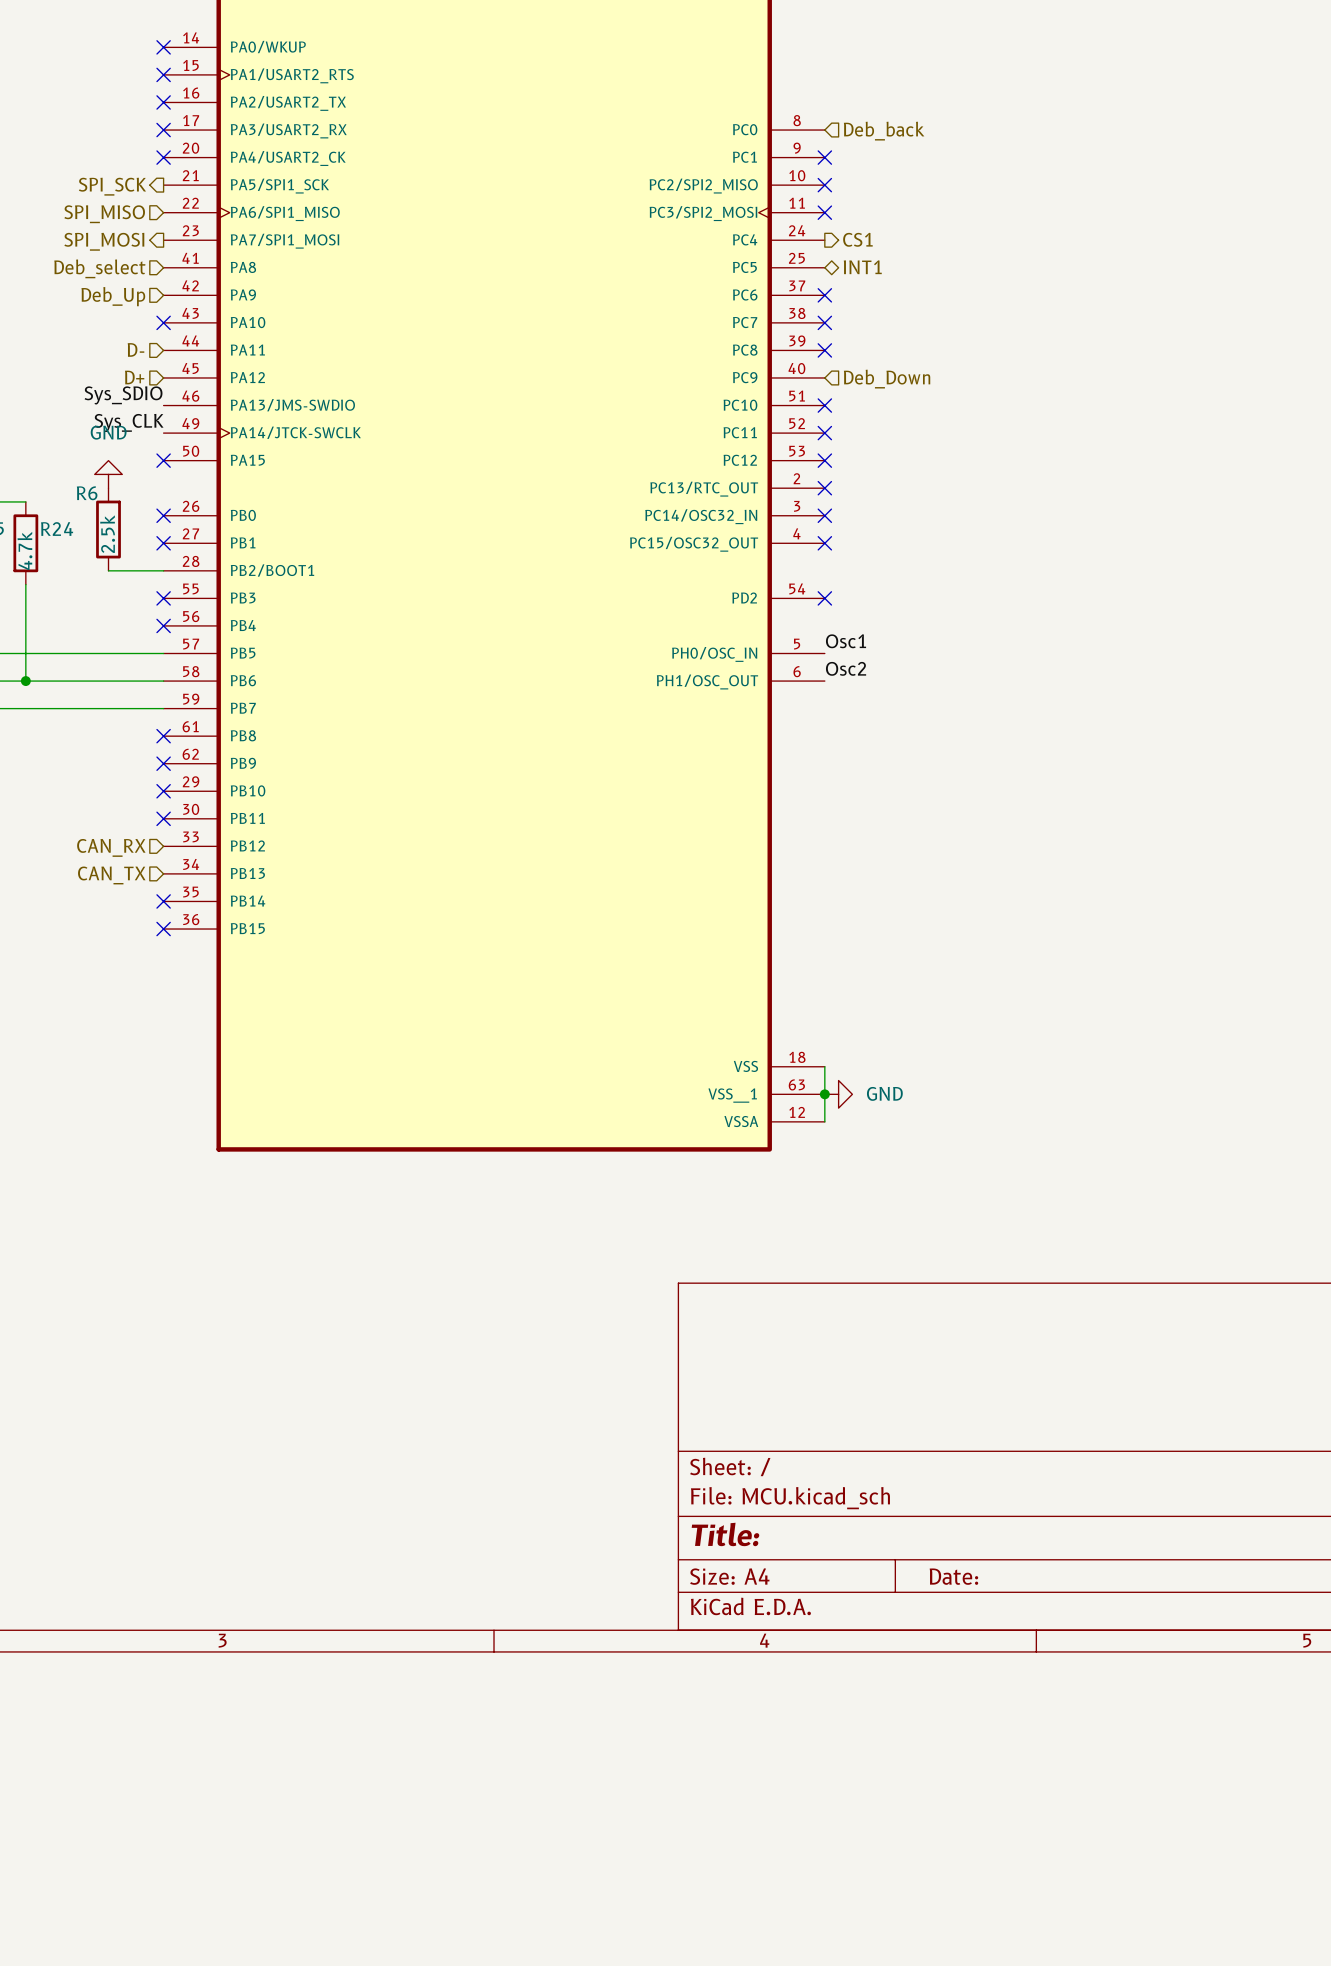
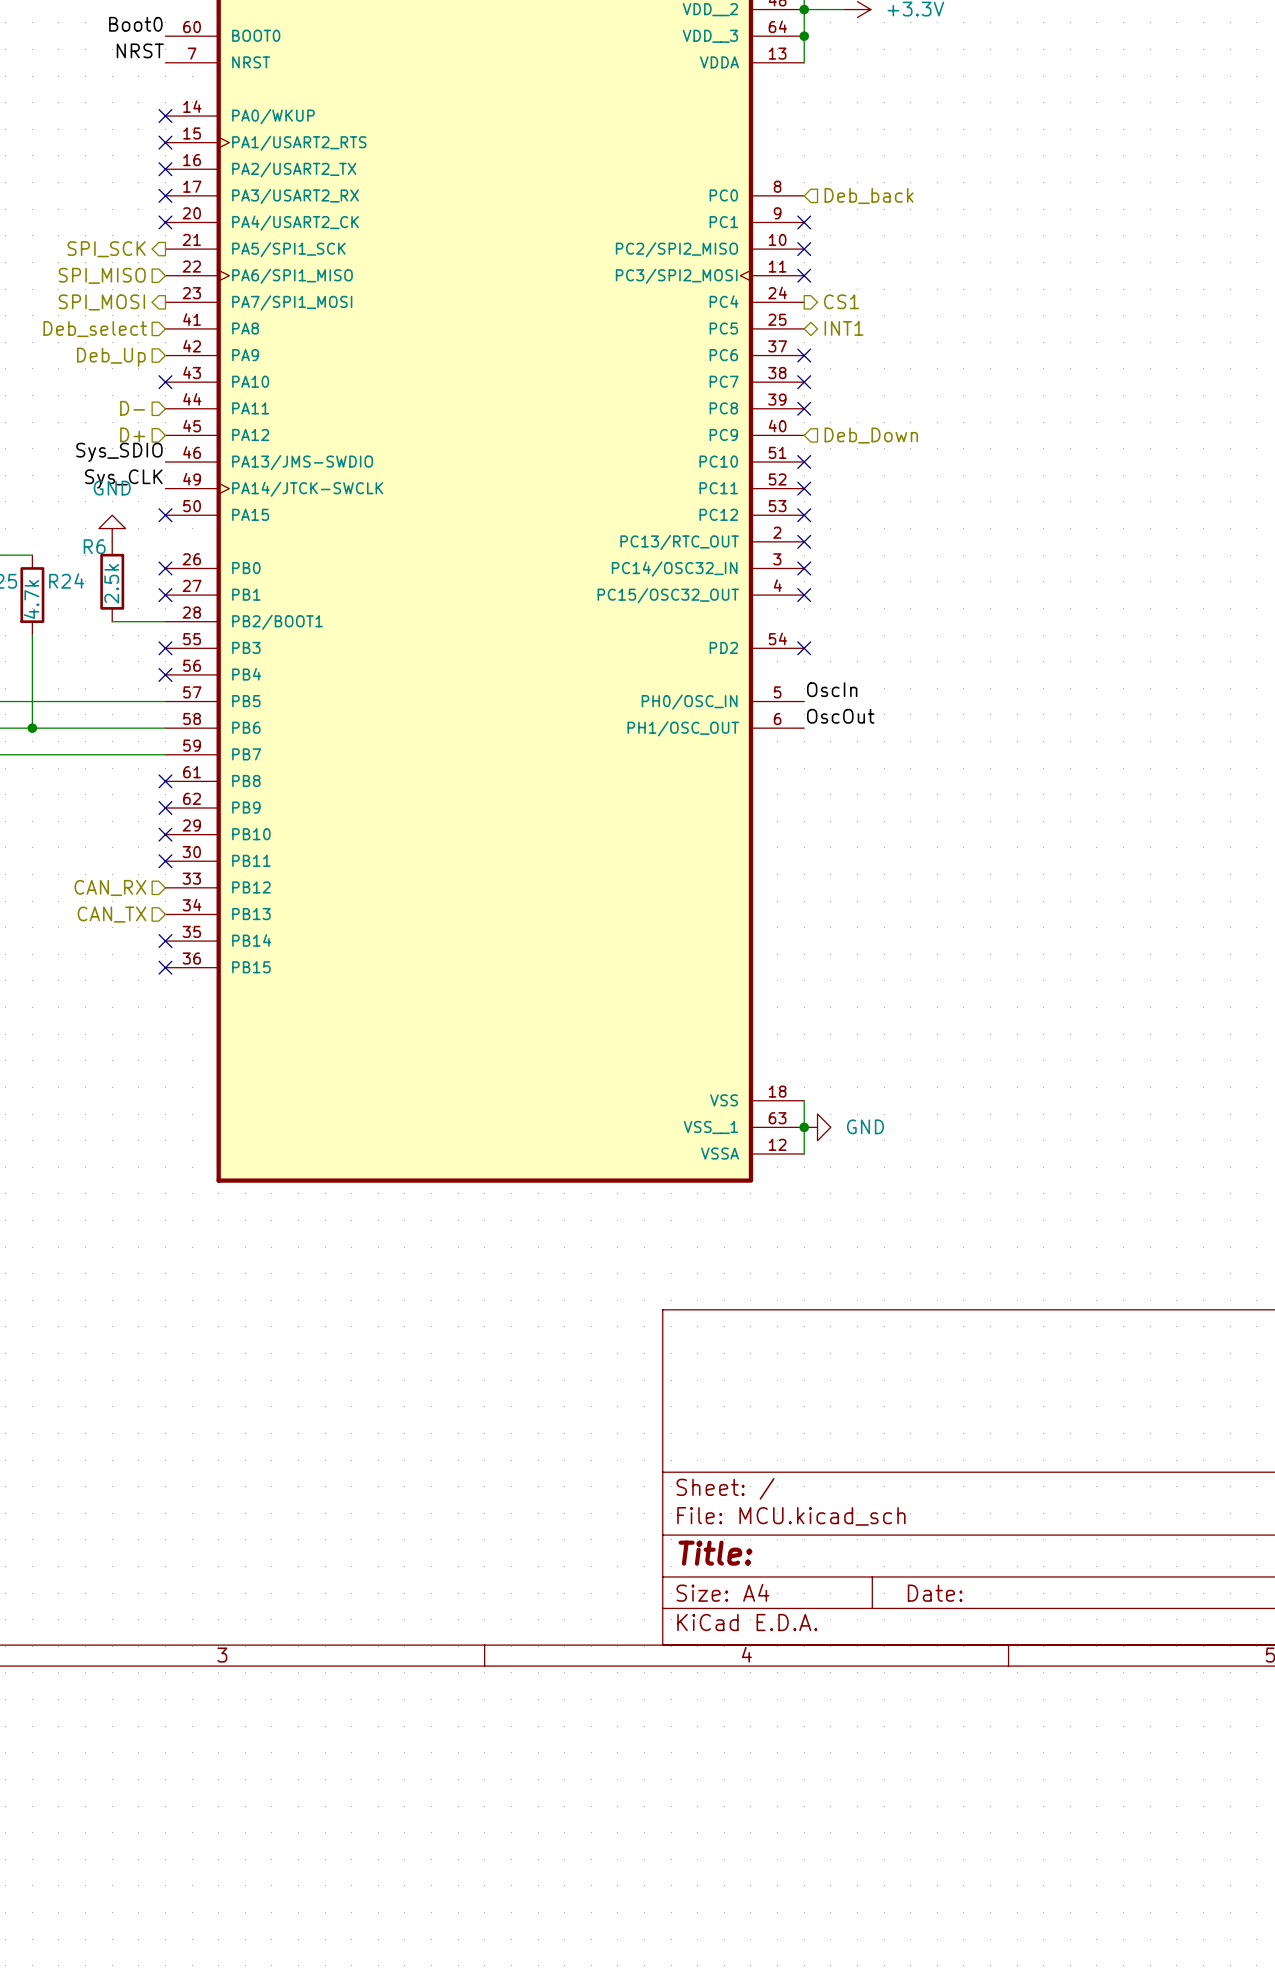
label: Osc1 (846, 641) -> OscIn (832, 689)
label: Osc2 (846, 668) -> OscOut (840, 716)

